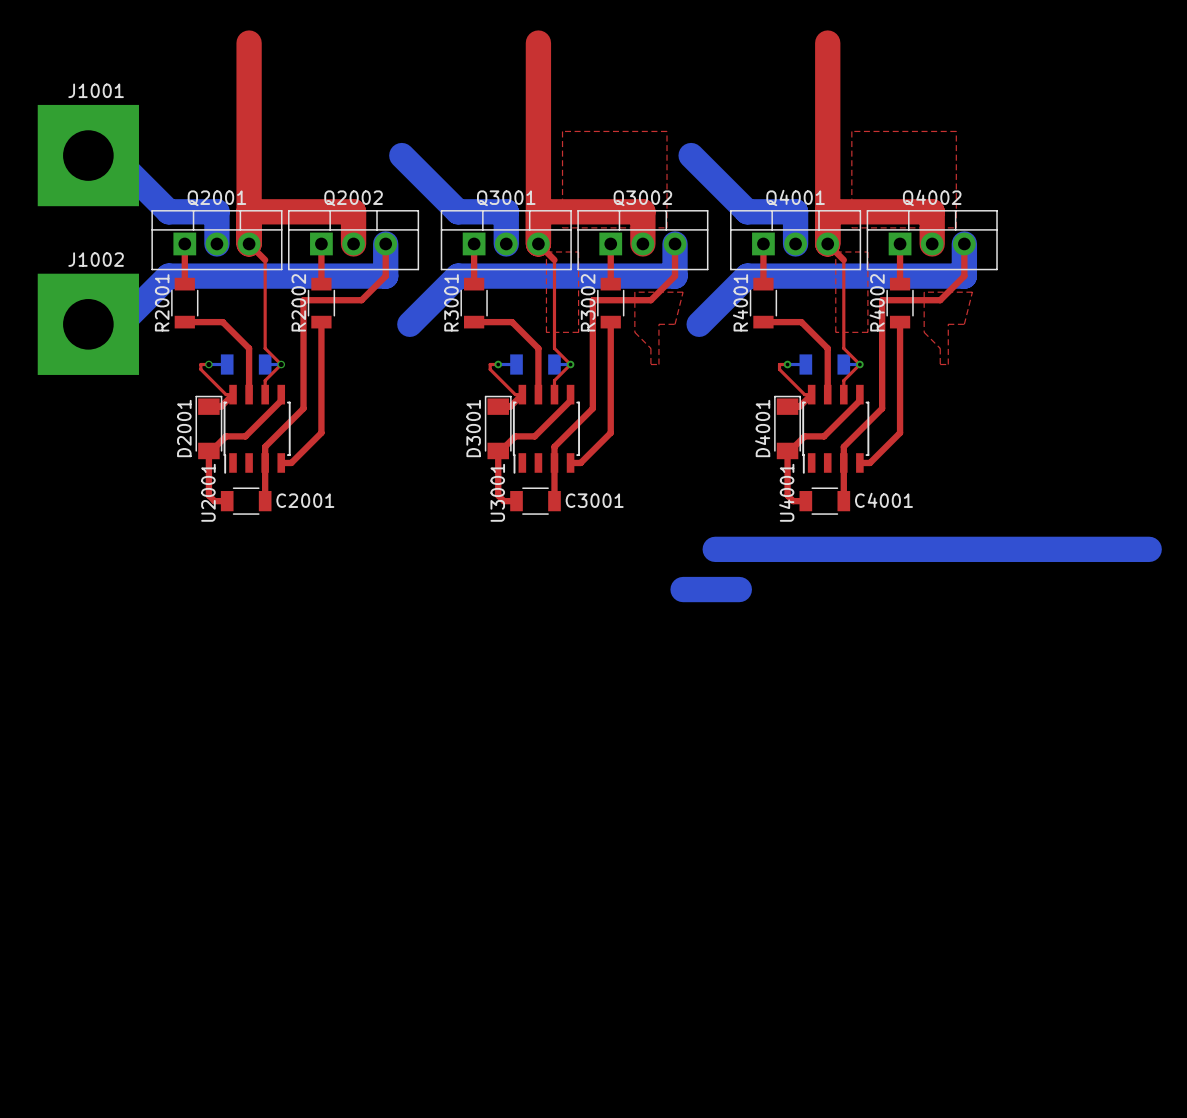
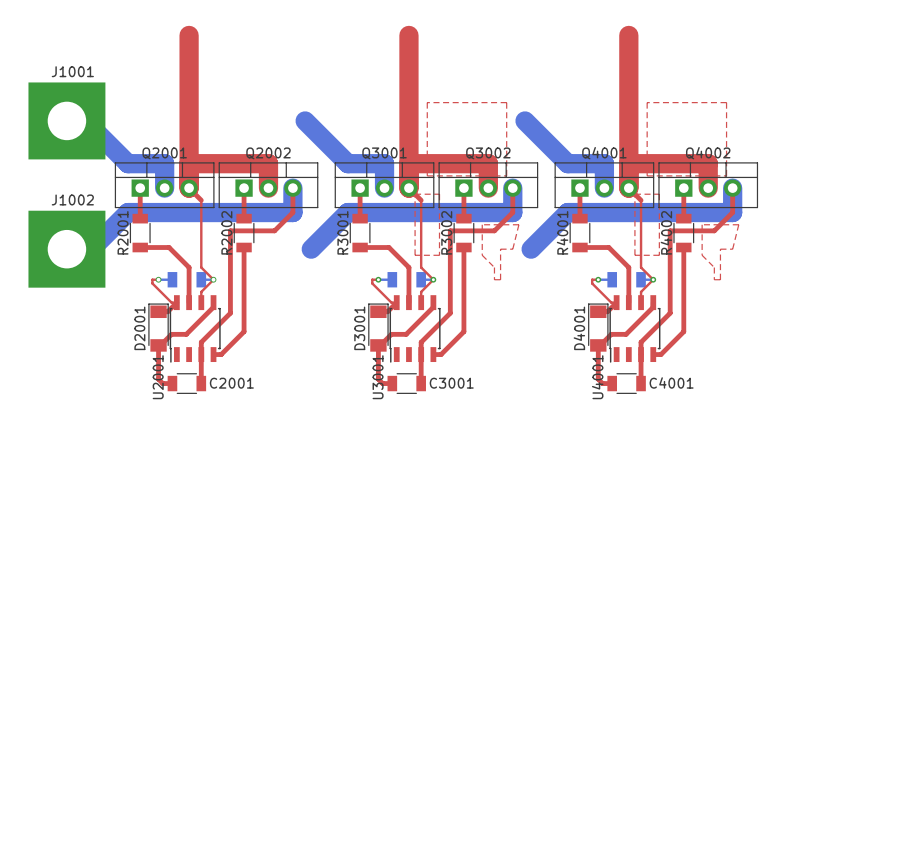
bottom track: (715, 549) (1149, 549) -> none
bottom track: (683, 589) (739, 589) -> none

